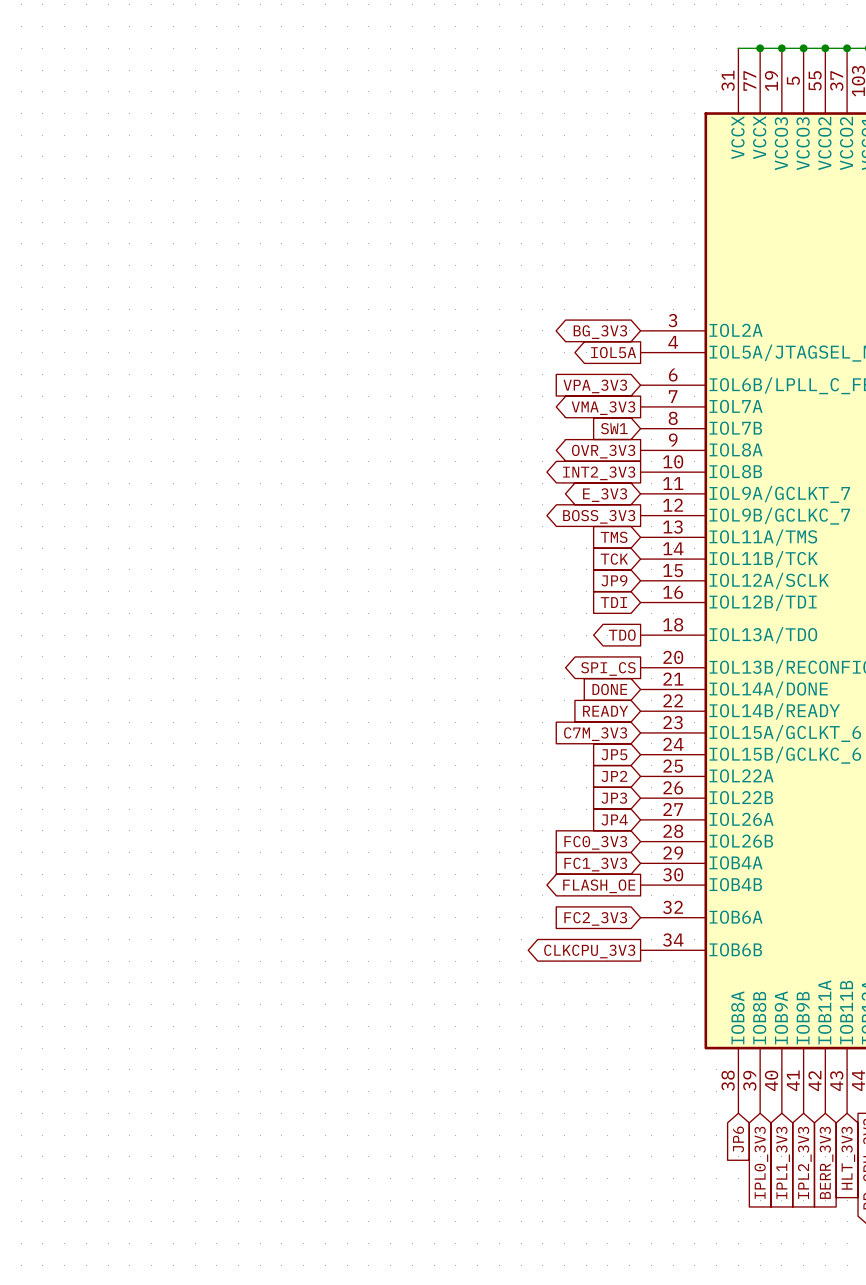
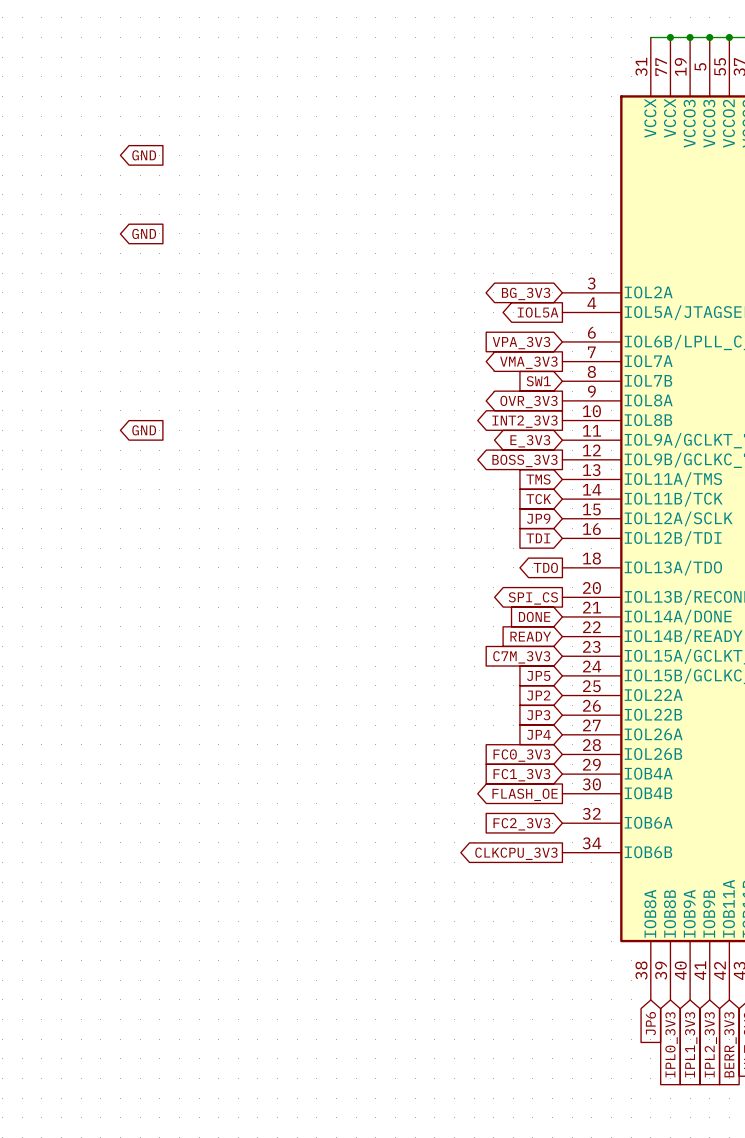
global label: none -> GND (144, 155)
global label: none -> GND (144, 233)
global label: none -> GND (144, 430)

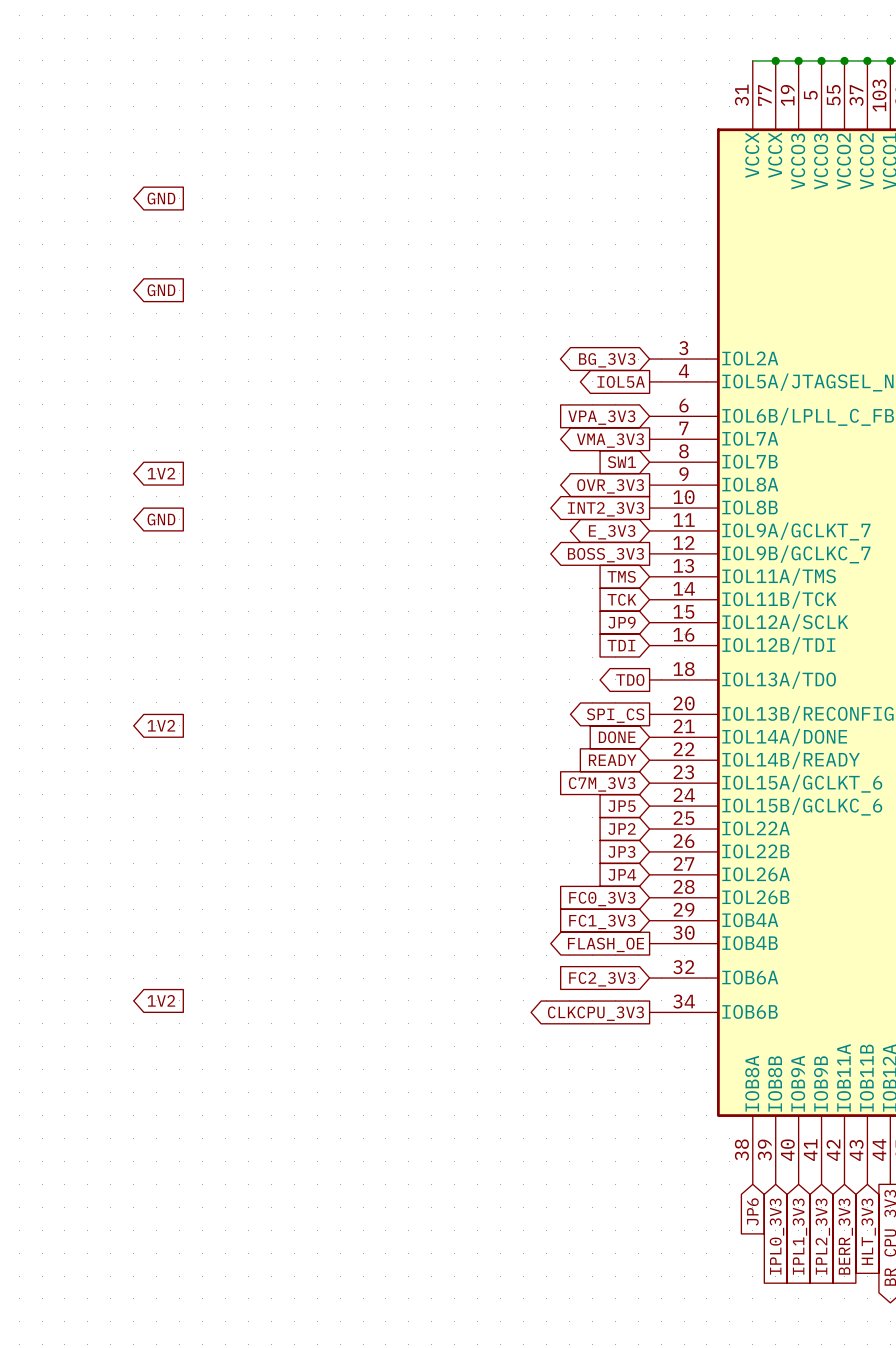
global label: none -> 1V2 (161, 473)
global label: none -> 1V2 (161, 725)
global label: none -> 1V2 (161, 1000)

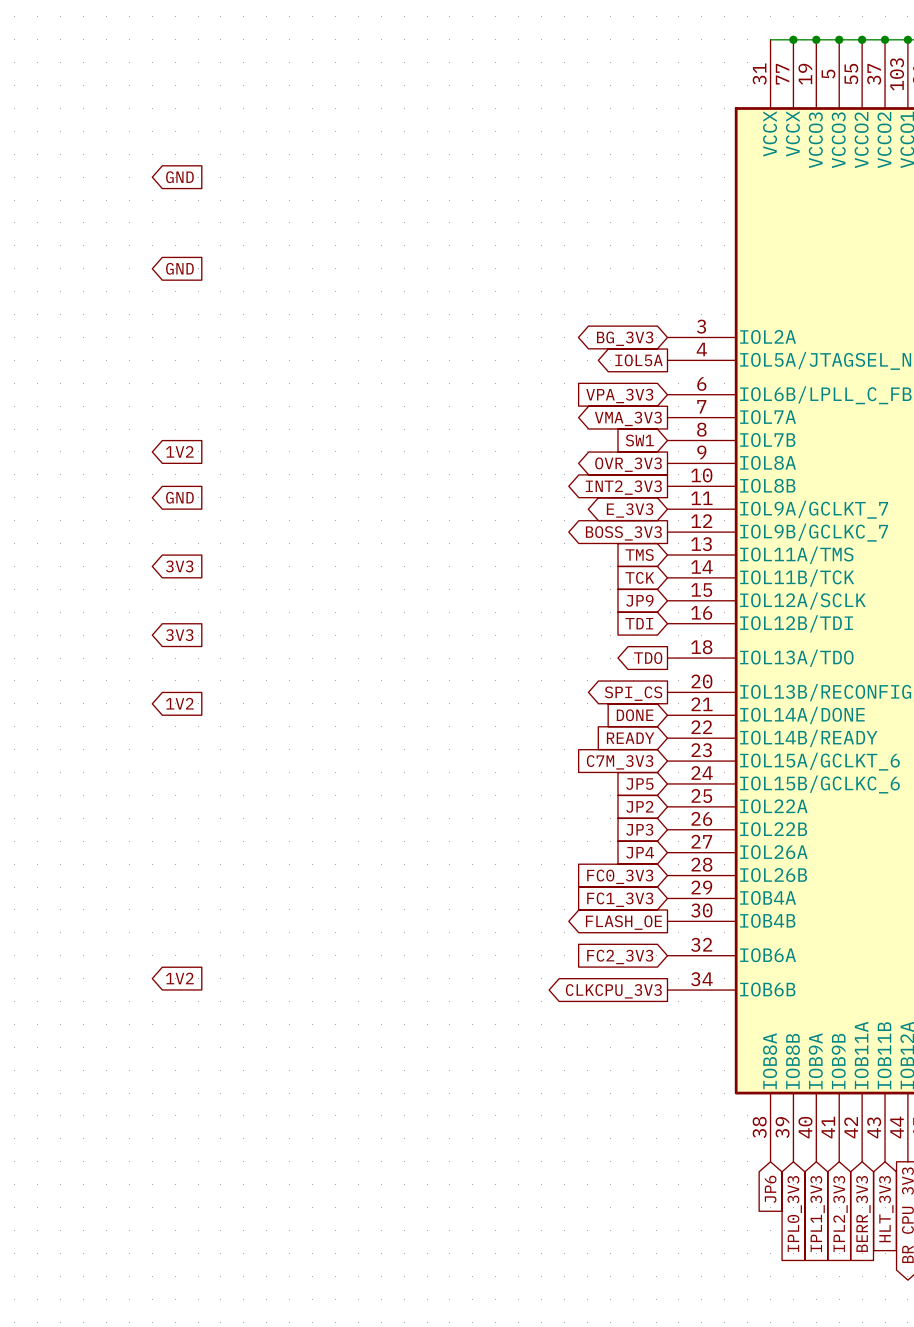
global label: none -> 3V3 (179, 566)
global label: none -> 3V3 (179, 635)

